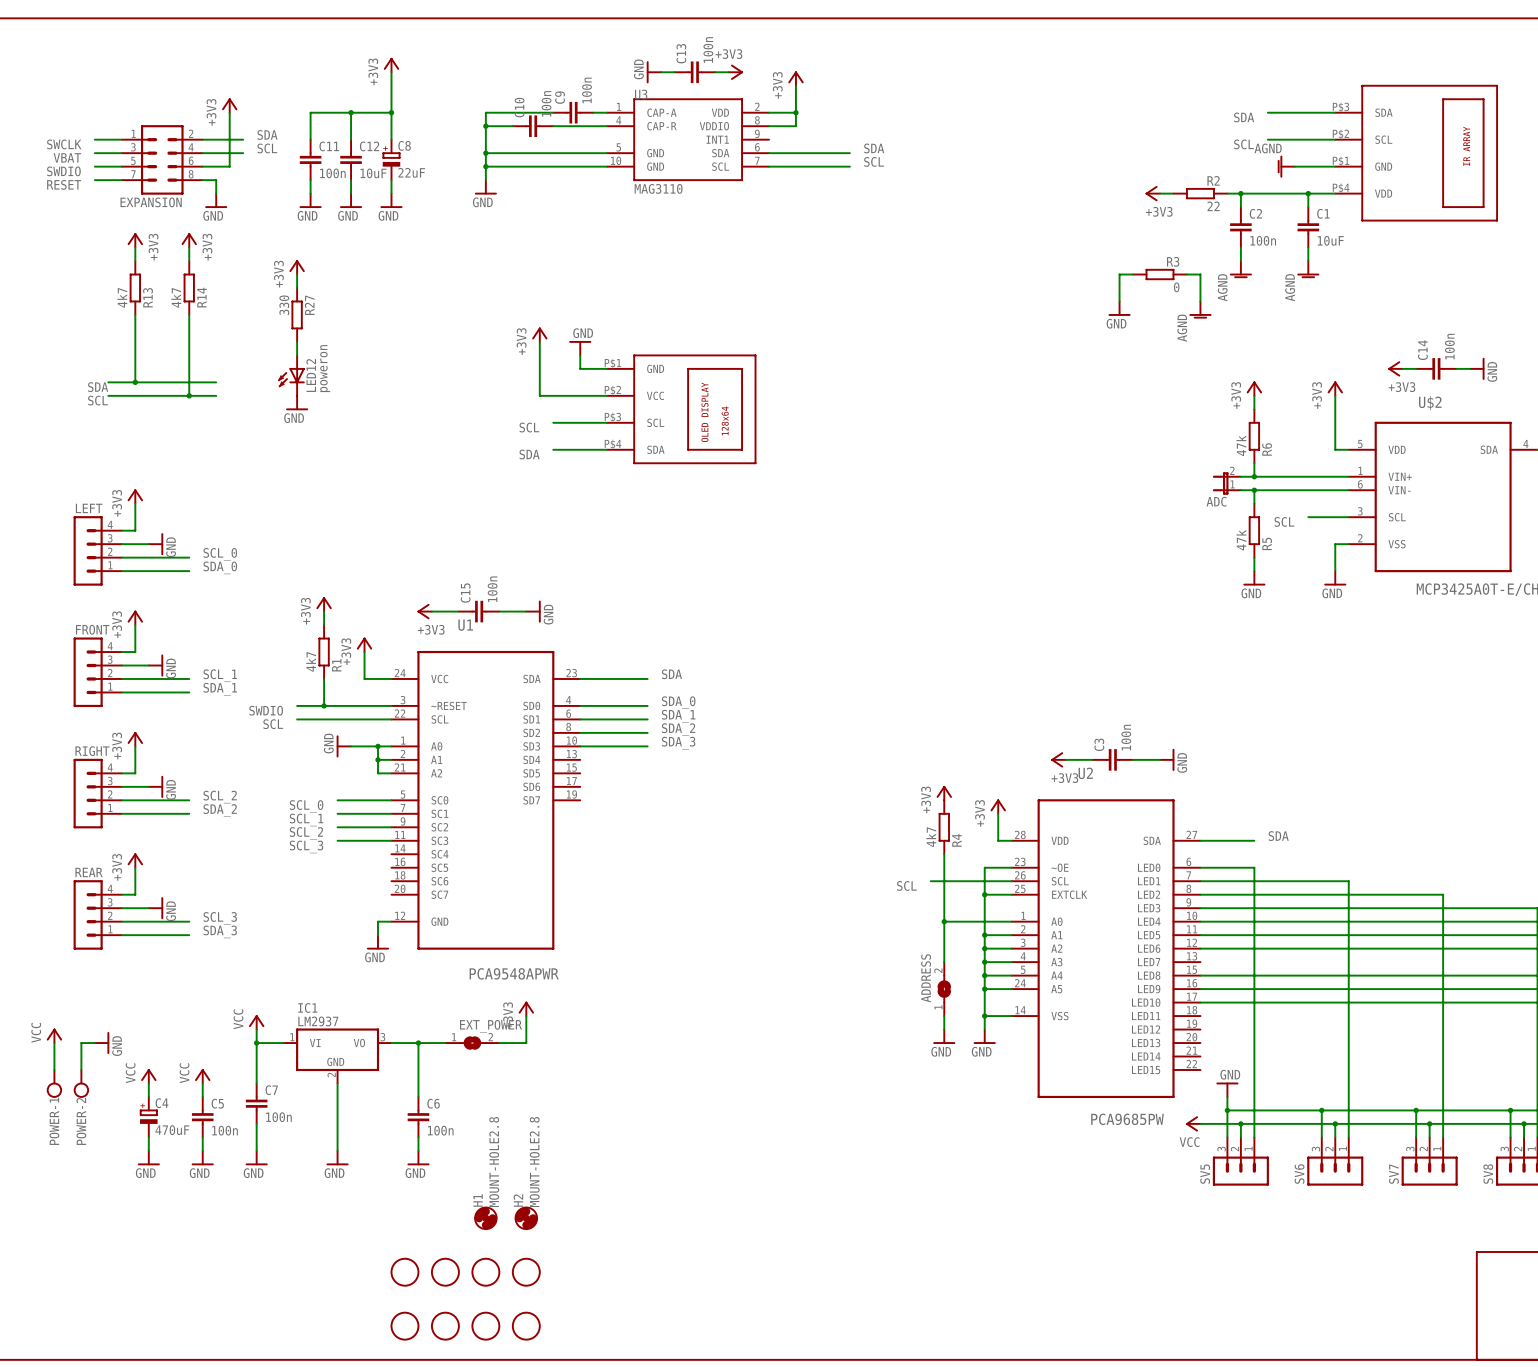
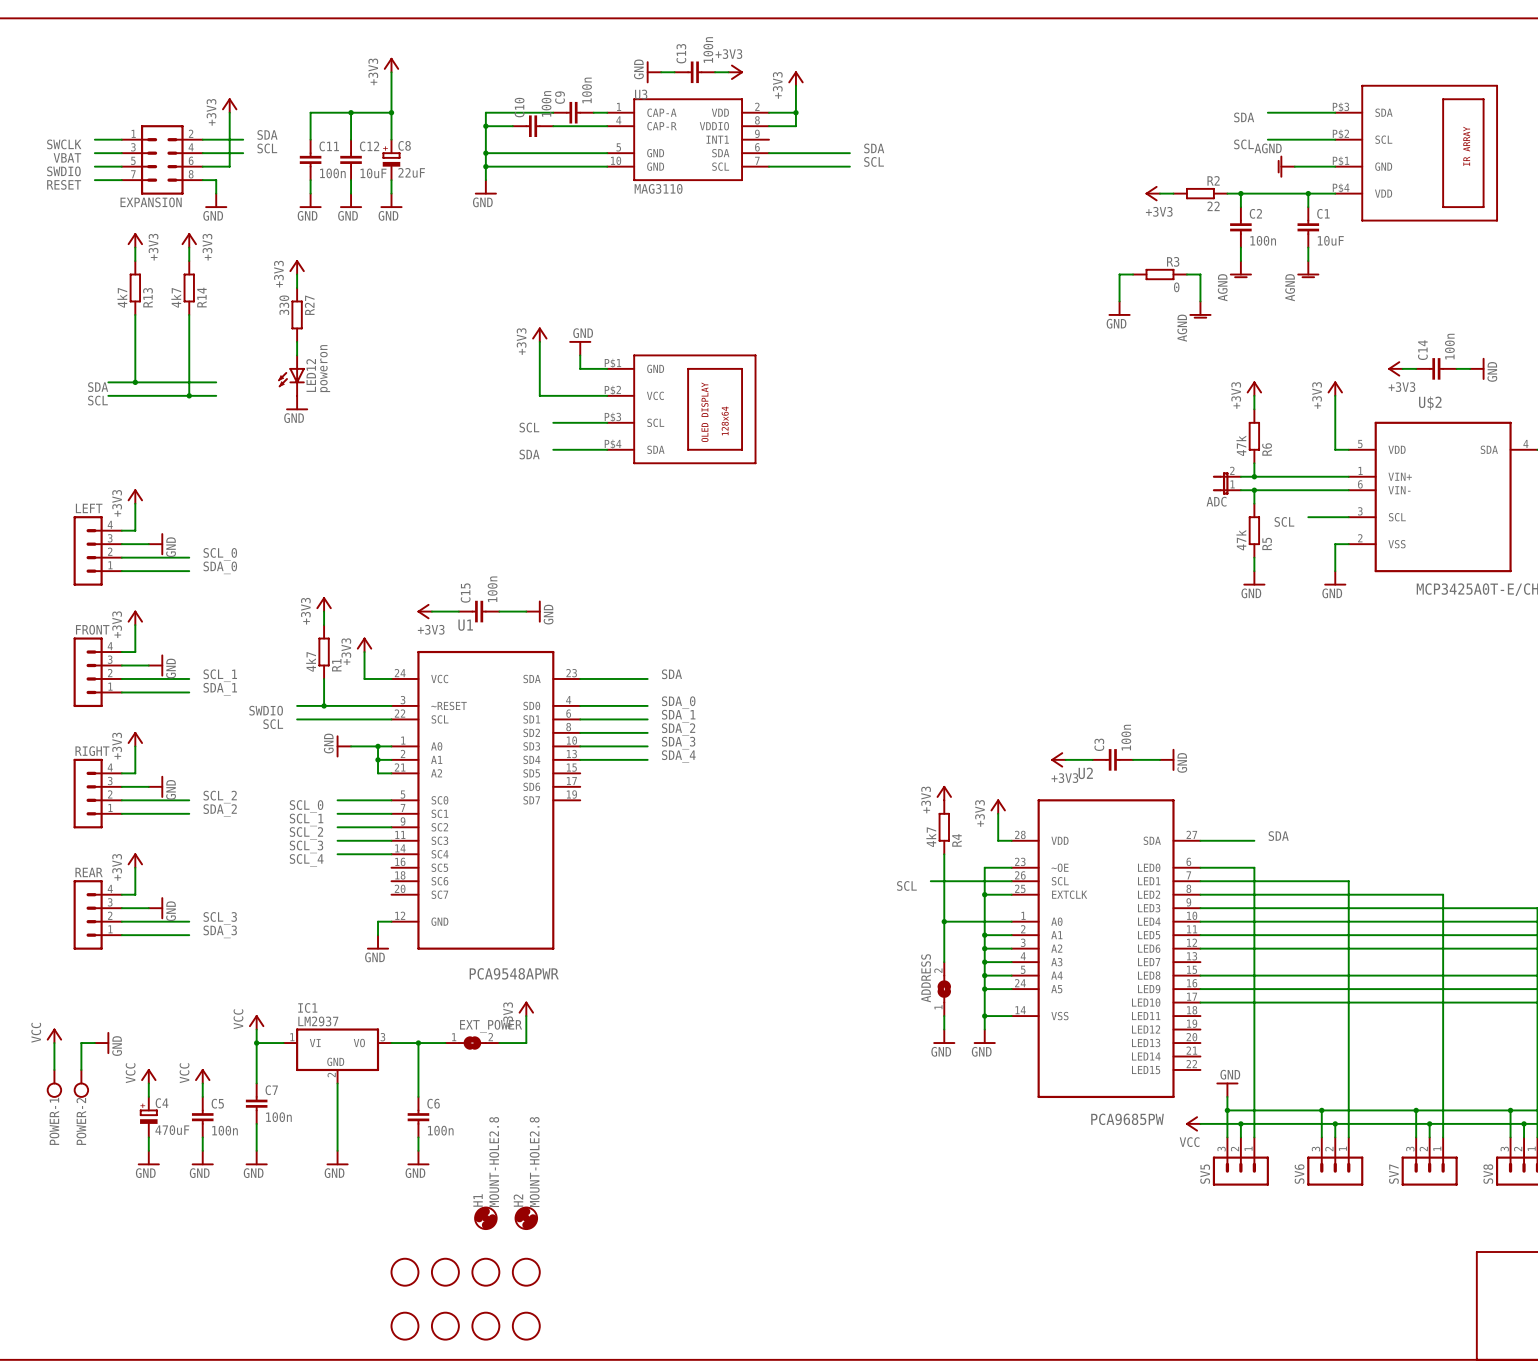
label: none -> SDA_4 (678, 756)
wire: none -> (580, 759) (647, 759)
wire: none -> (337, 854) (391, 854)
label: none -> SCL_4 (306, 860)

